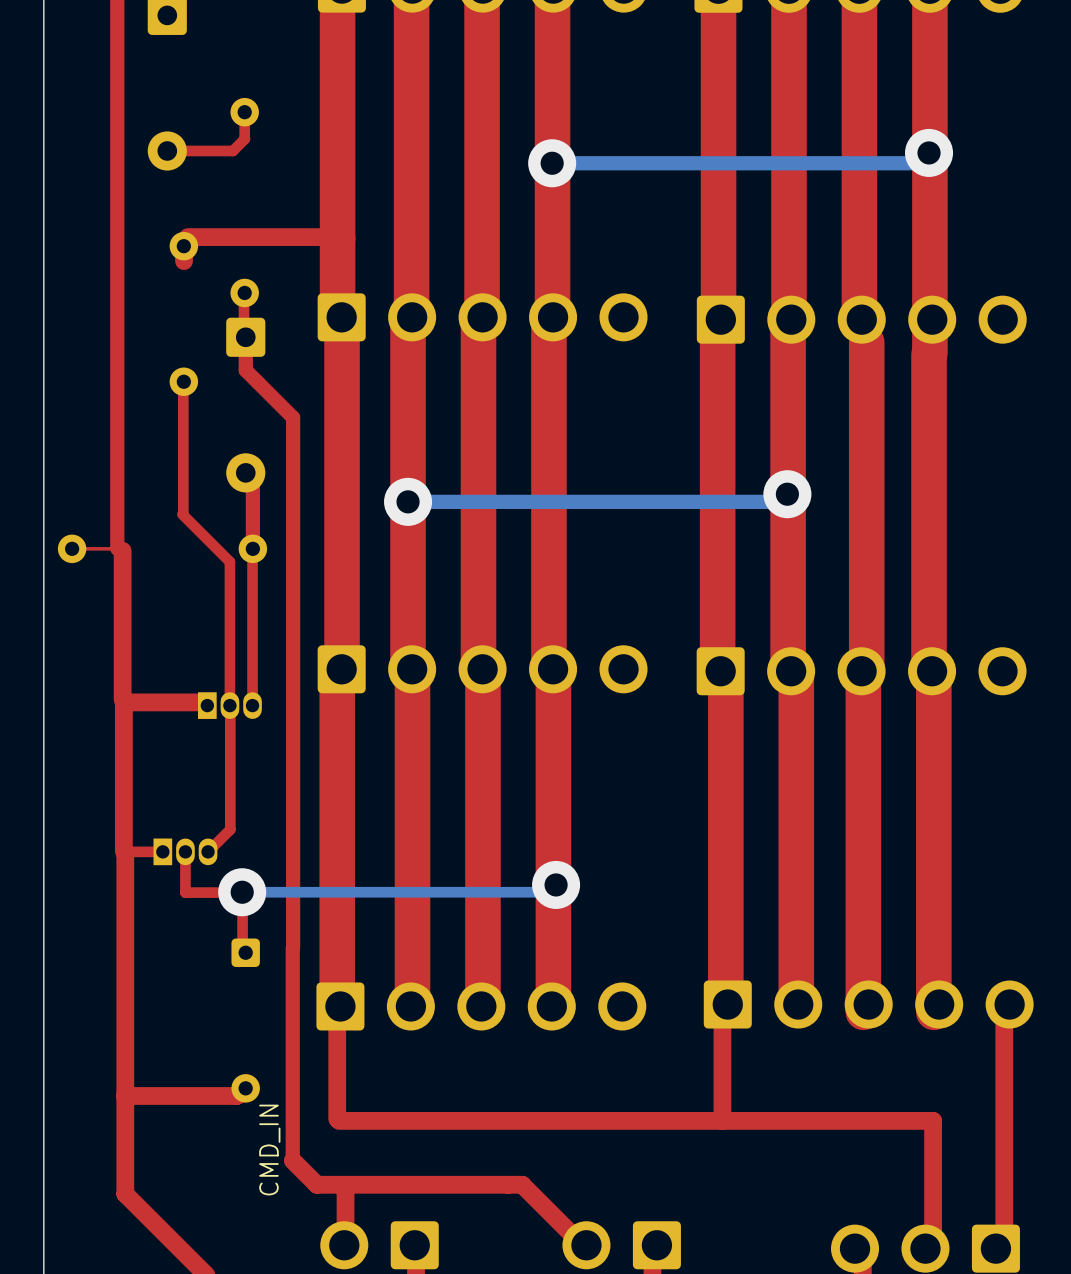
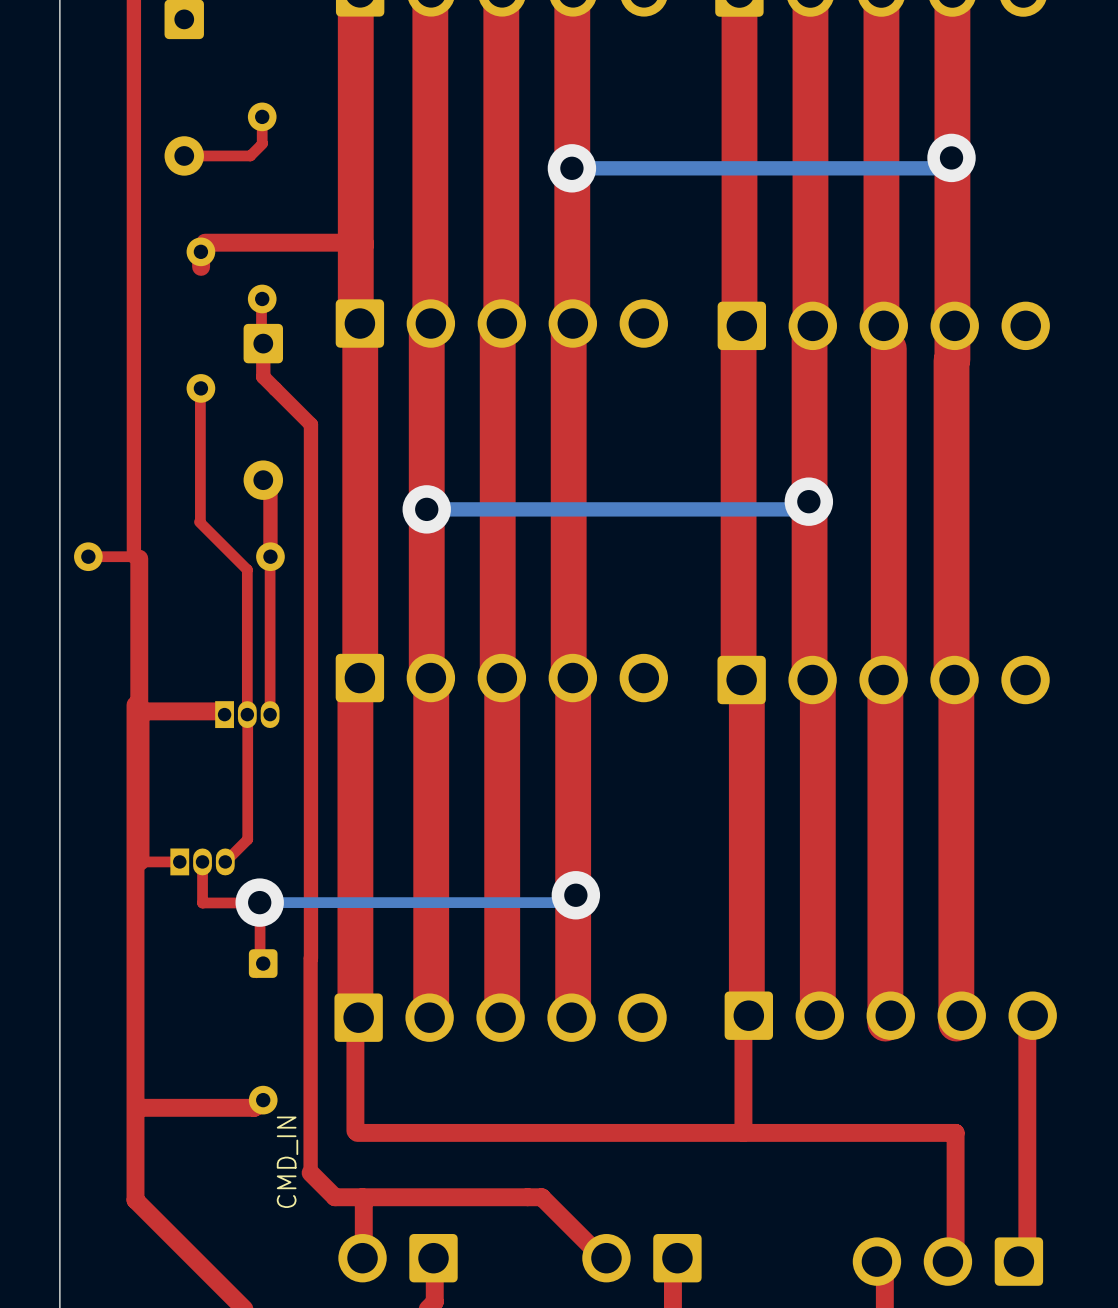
top track width: thin (120, 548) (72, 548) -> thick (137, 556) (88, 556)
top track: (162, 851) (127, 851) (125, 853) (125, 1194) -> (135, 704) (135, 1200) (141, 1206)

